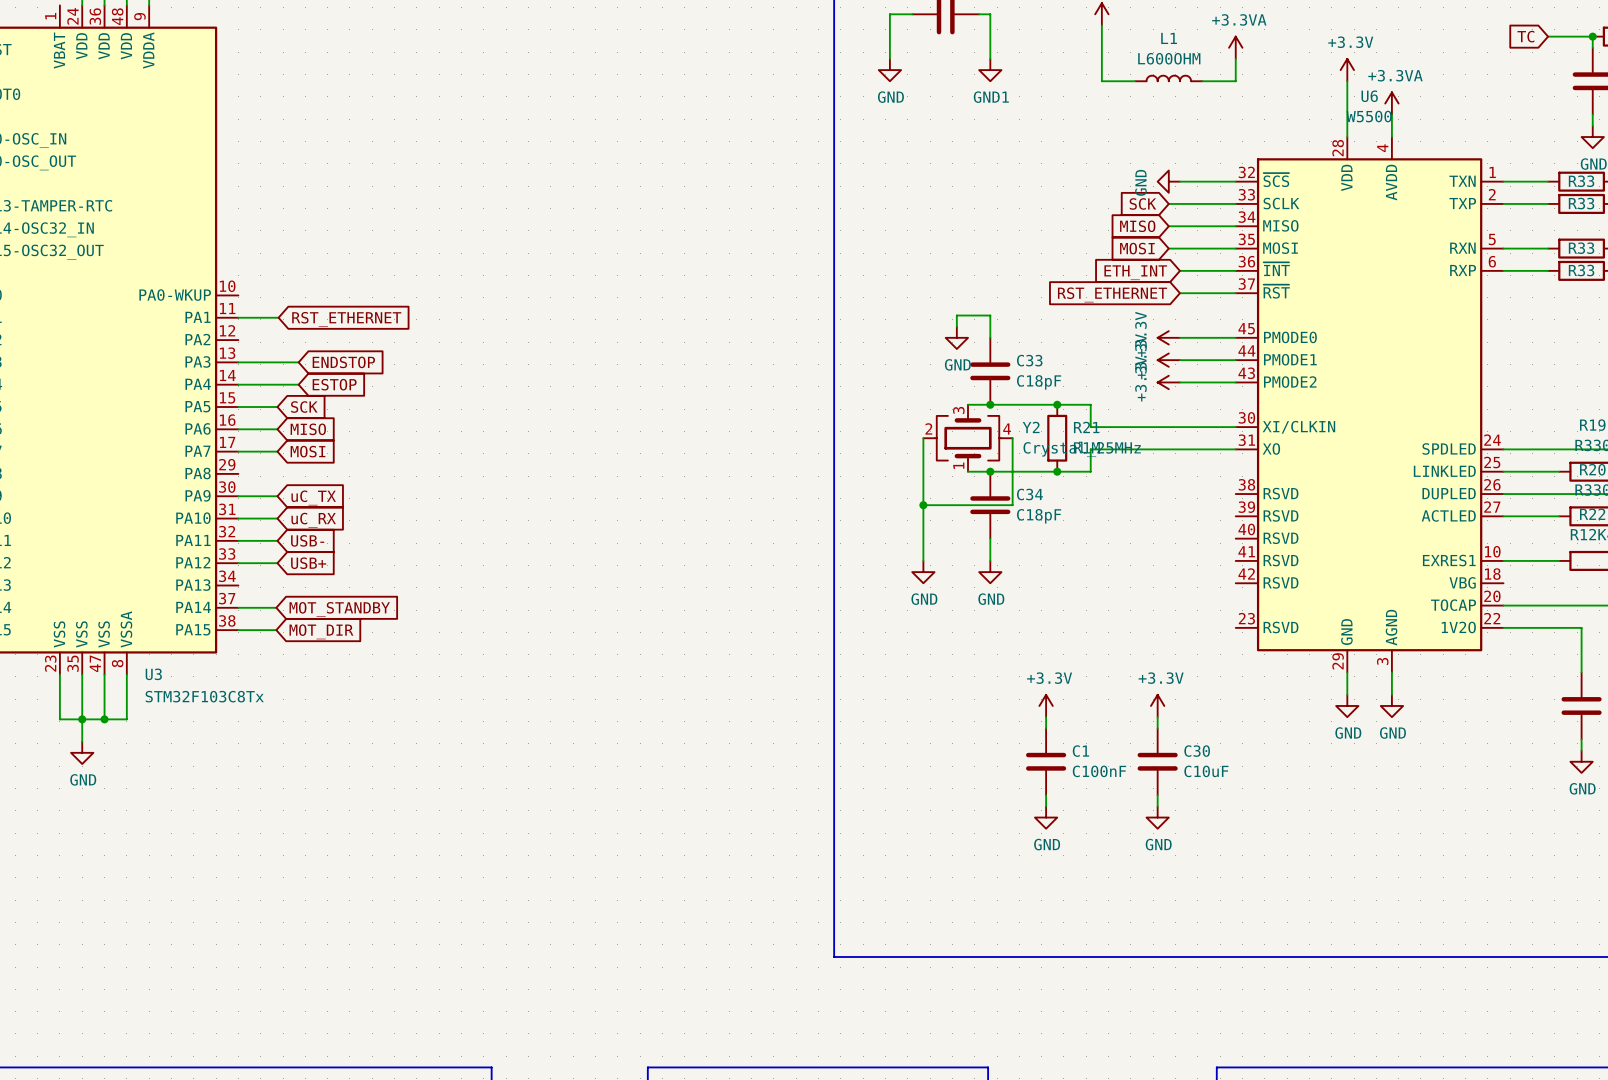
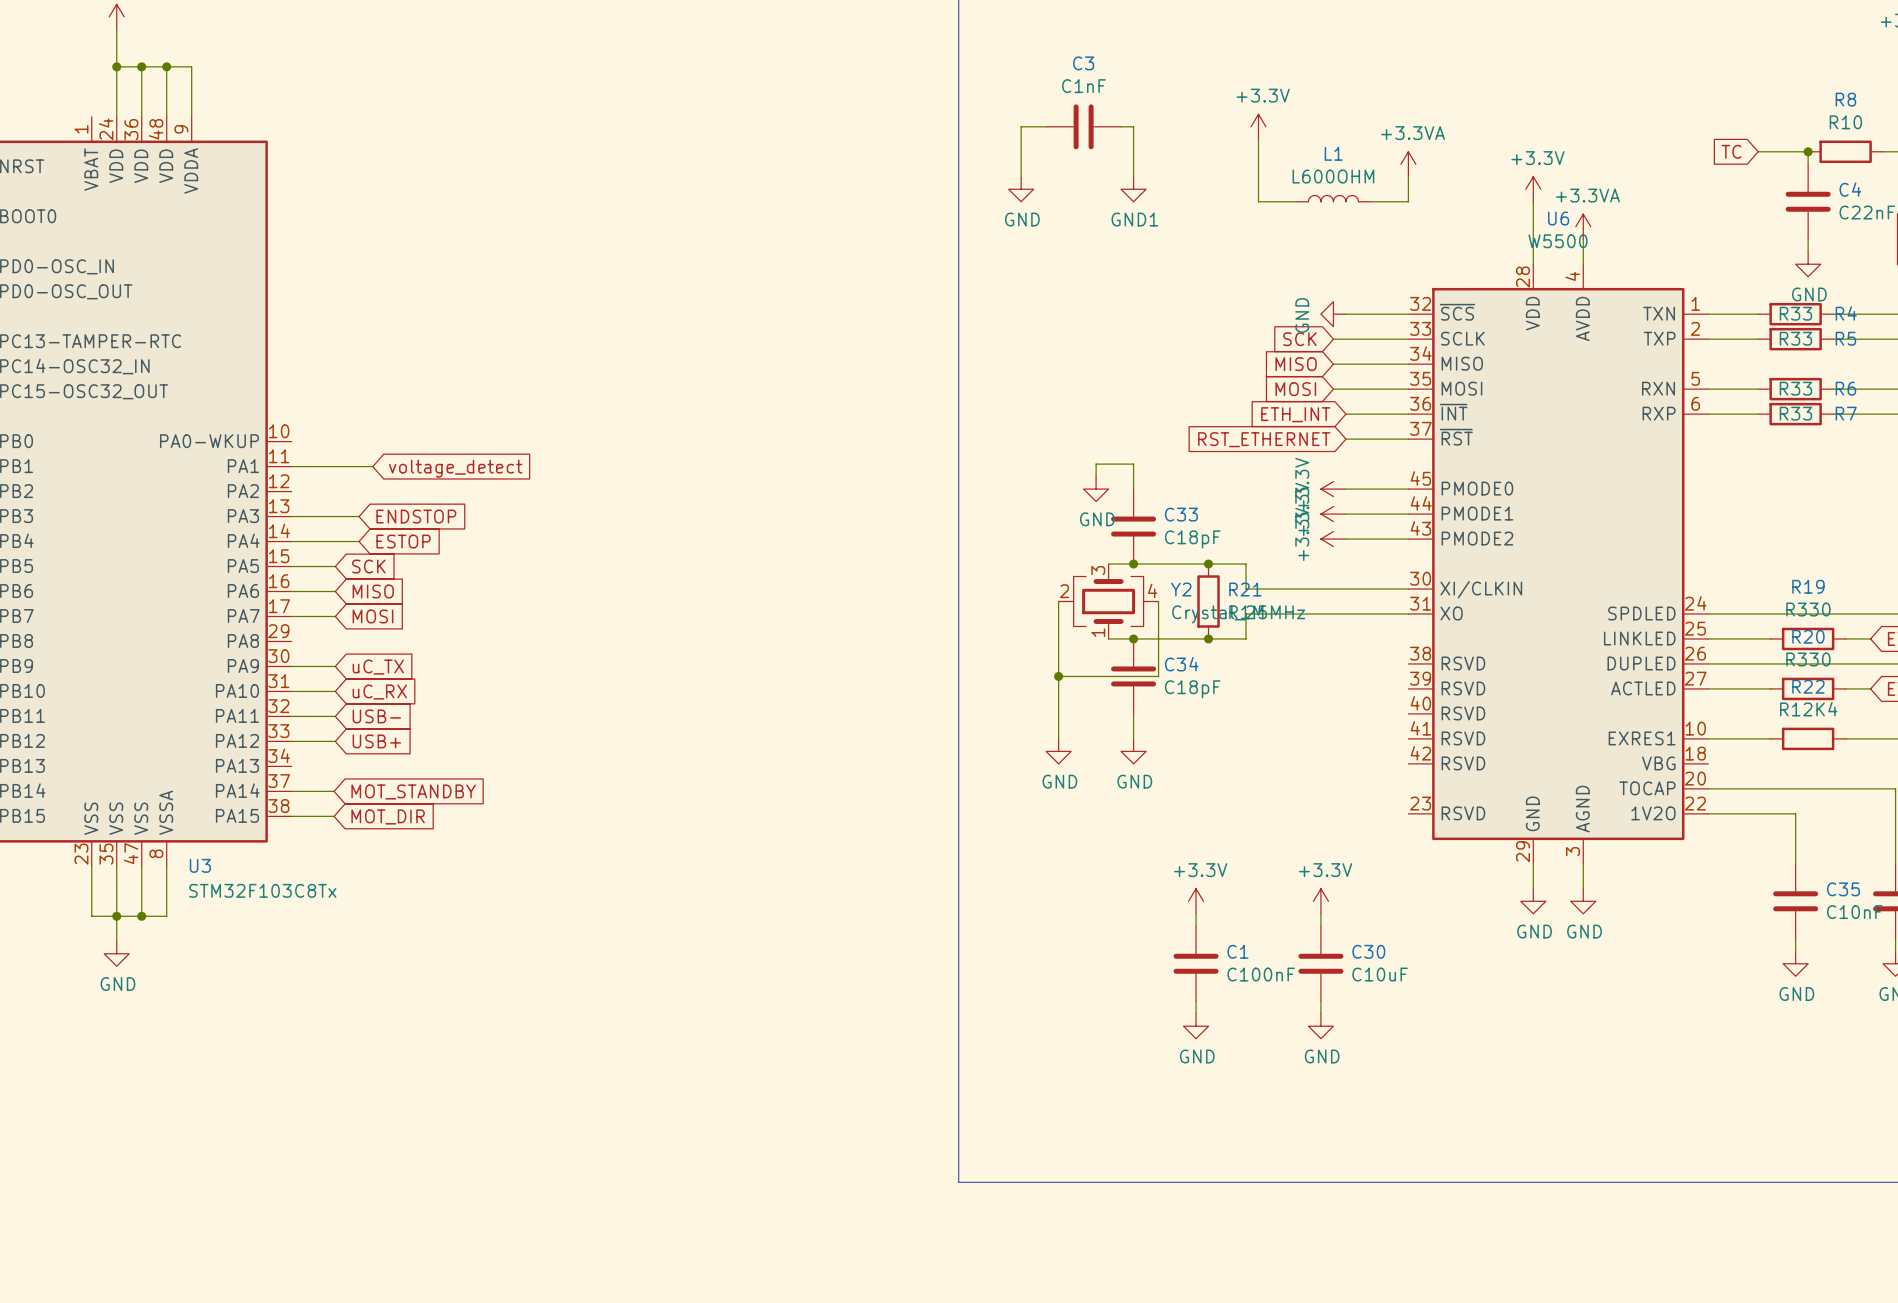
wire: none -> (336, 466) (372, 466)
global label: RST_ETHERNET (346, 319) -> none
global label: none -> voltage_detect (455, 468)

